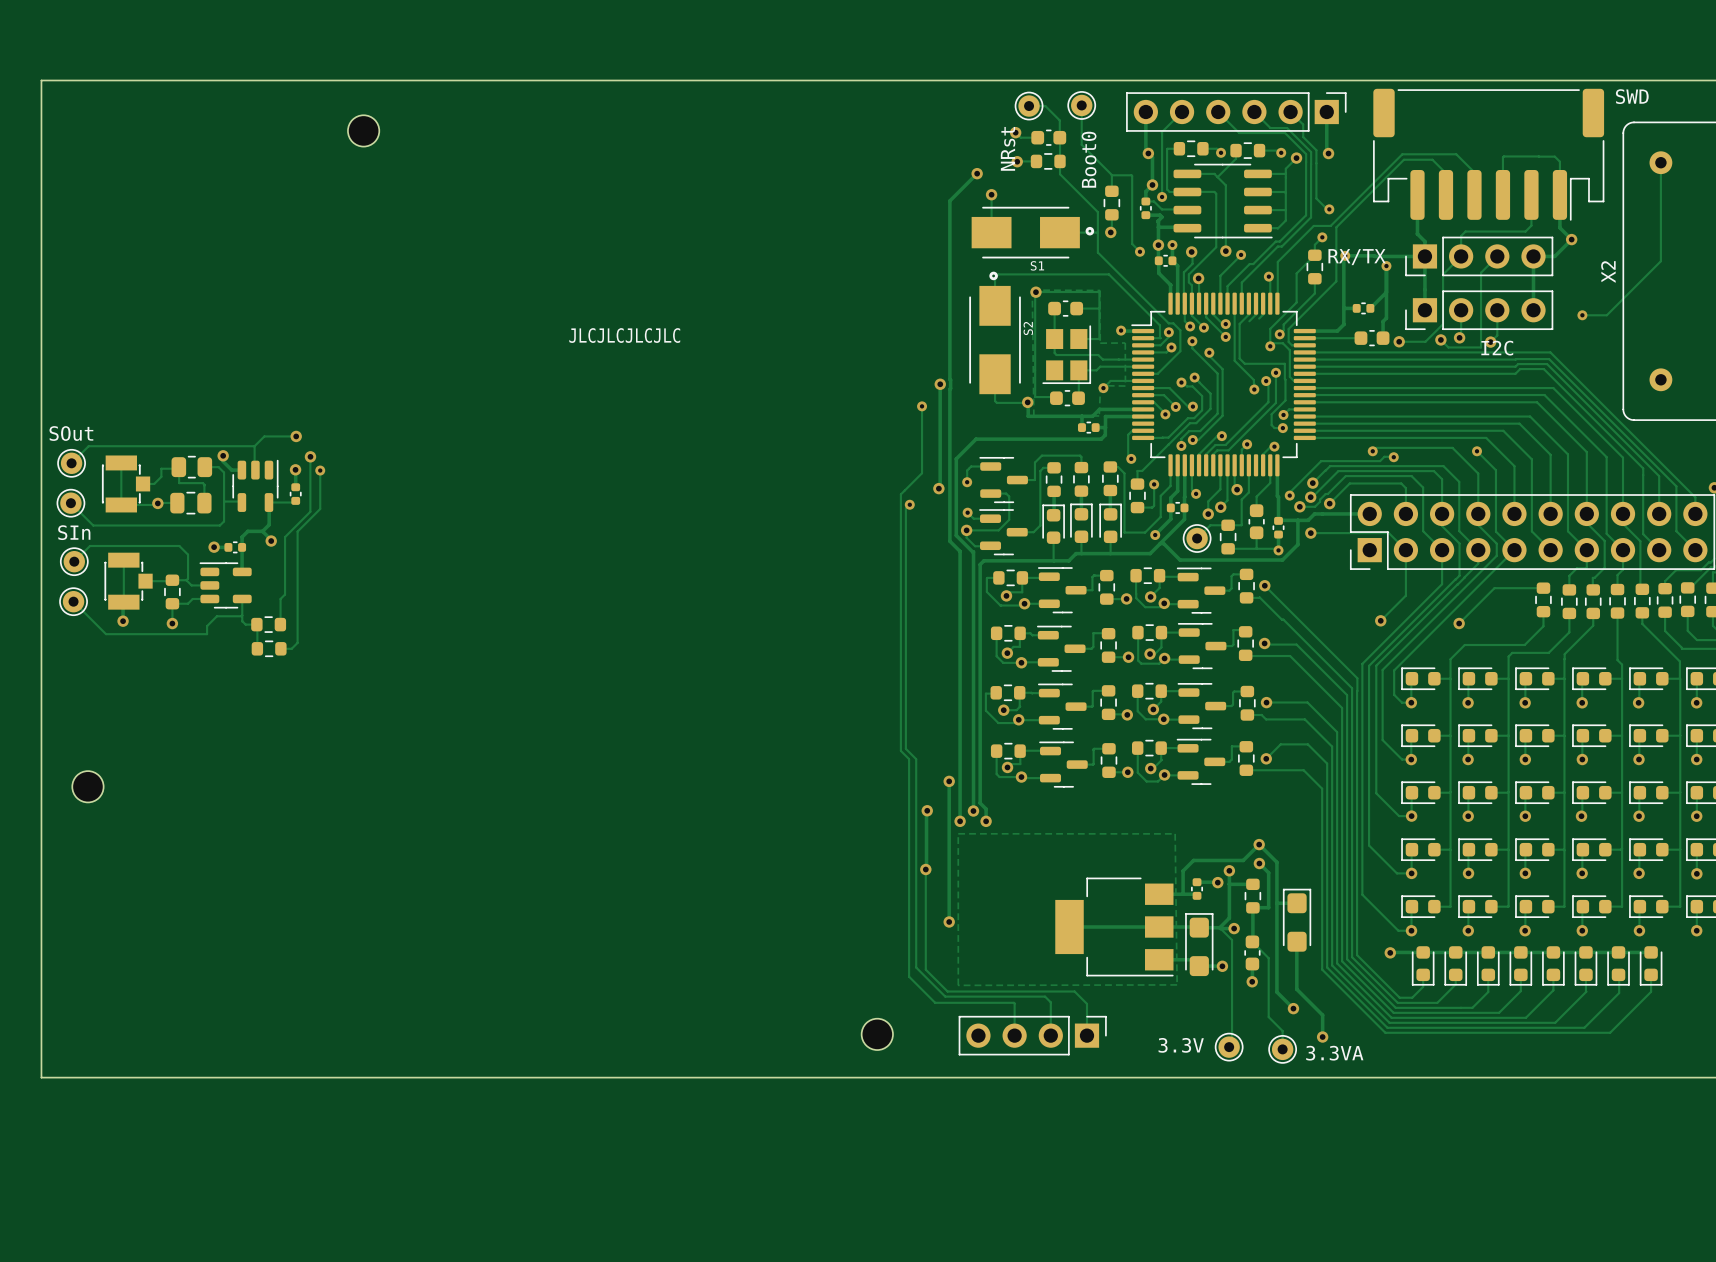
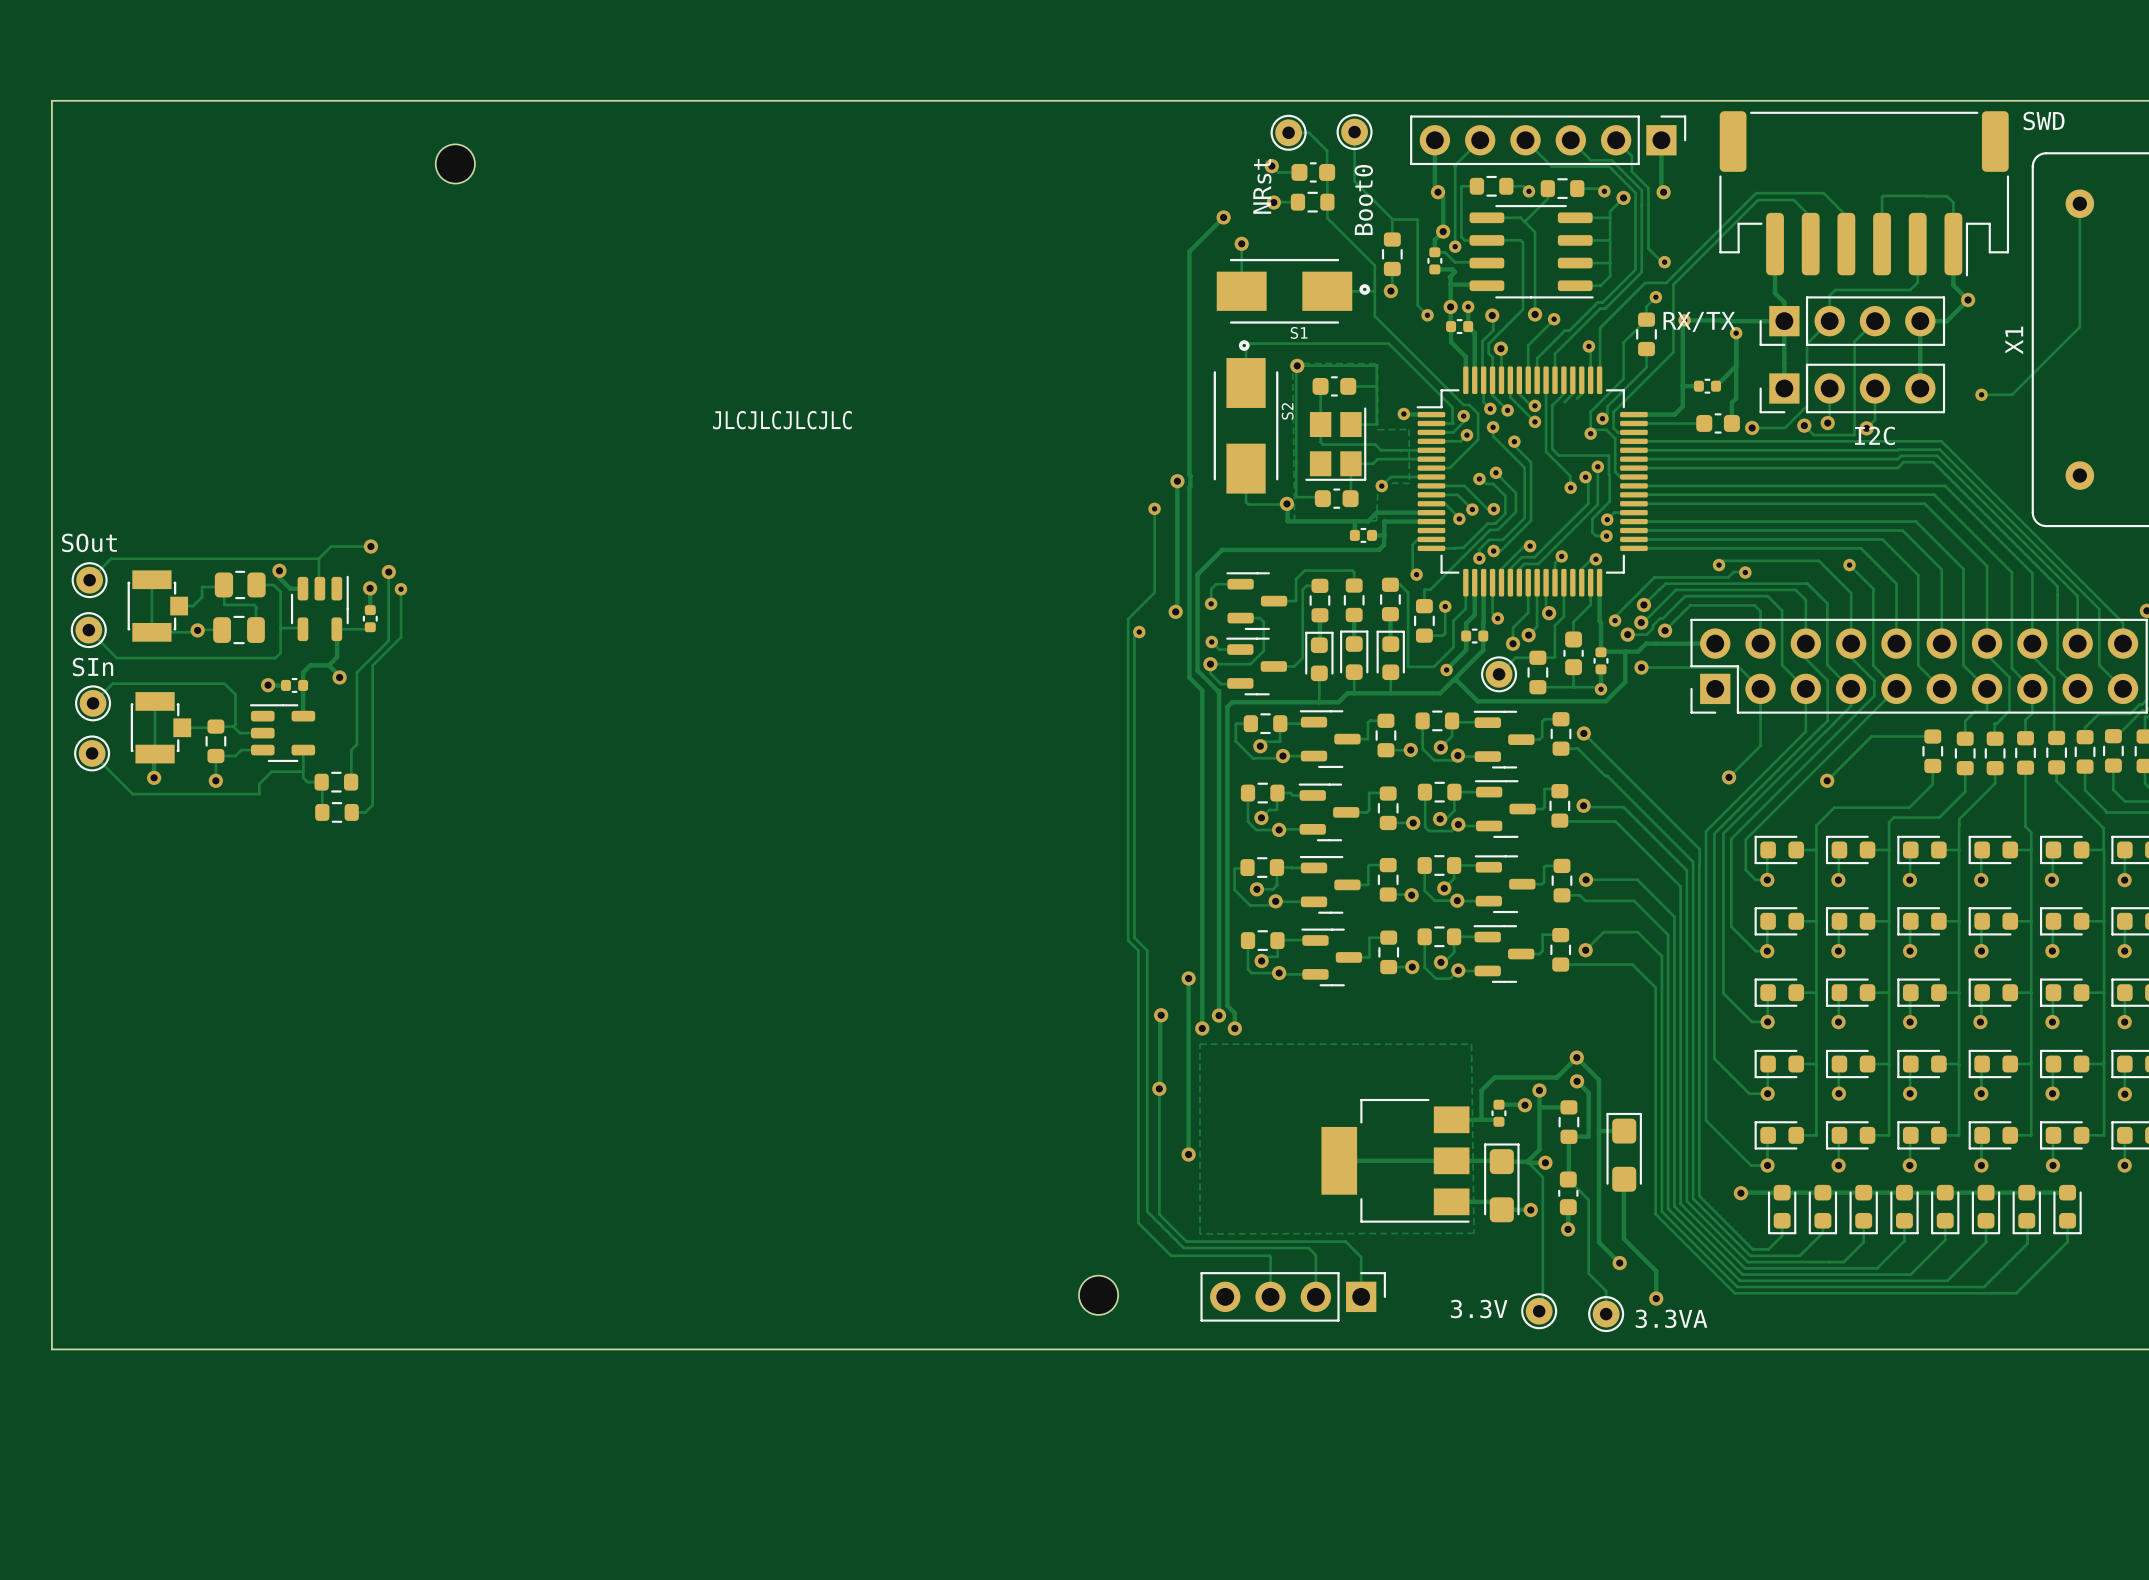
X2 name: X2 (1608, 272) -> X1 (2014, 340)
part: (87, 786) -> none

